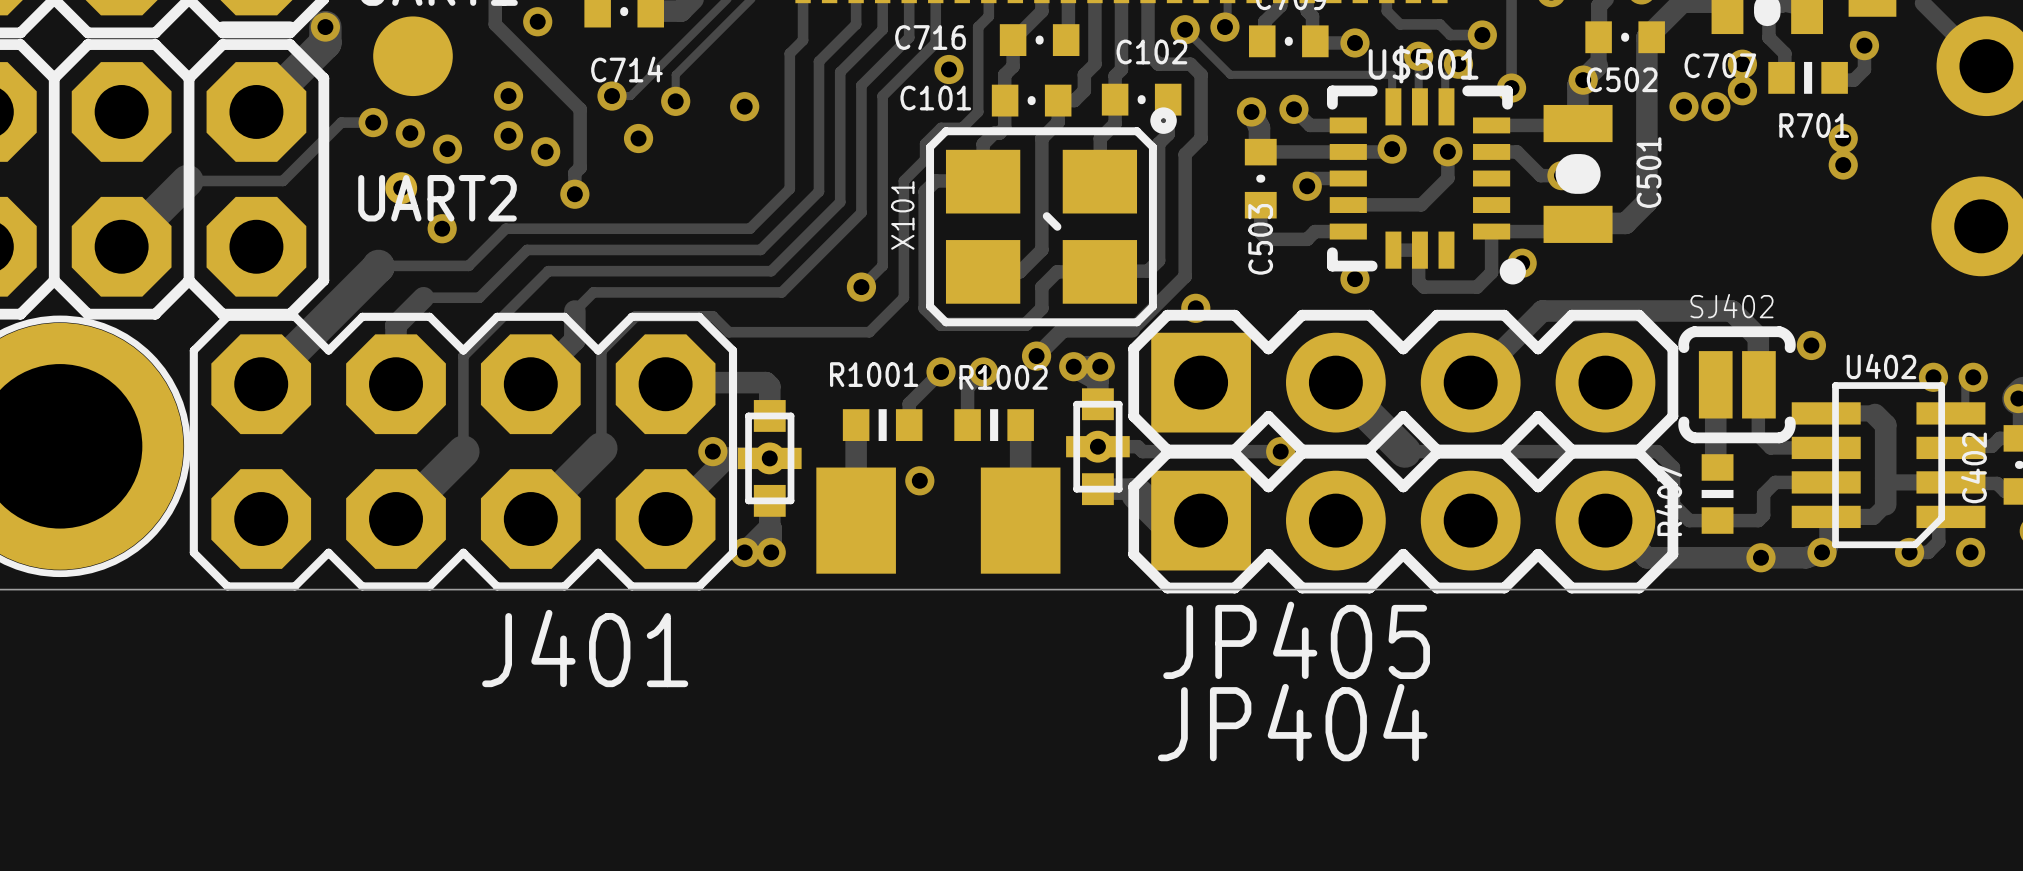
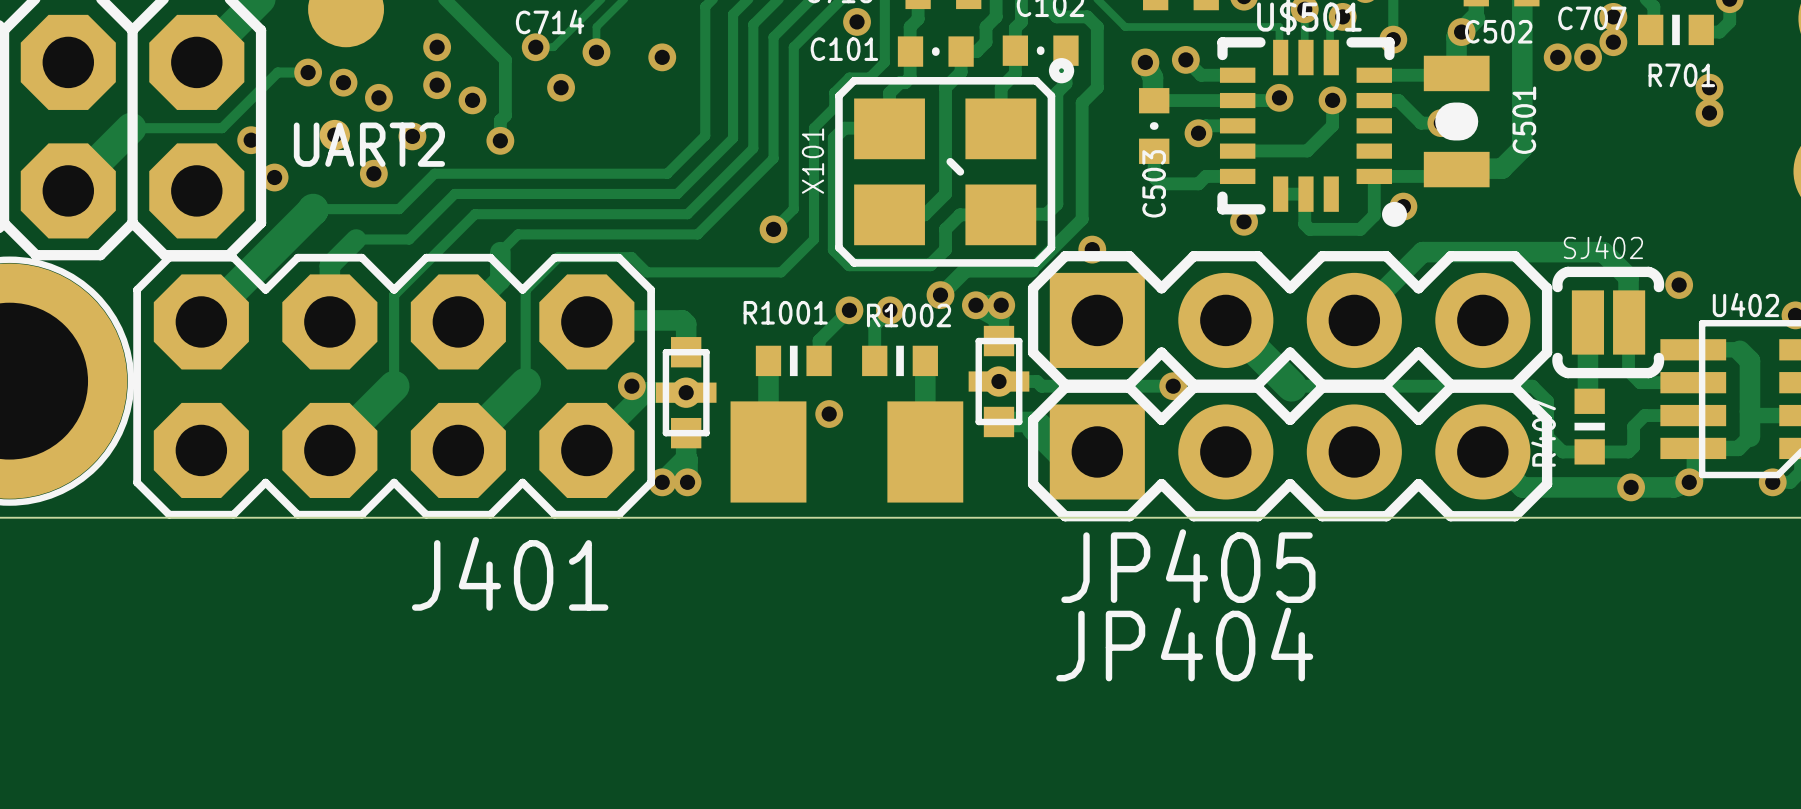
via: none -> (412, 136)
via: none -> (251, 140)
via: none -> (274, 177)

